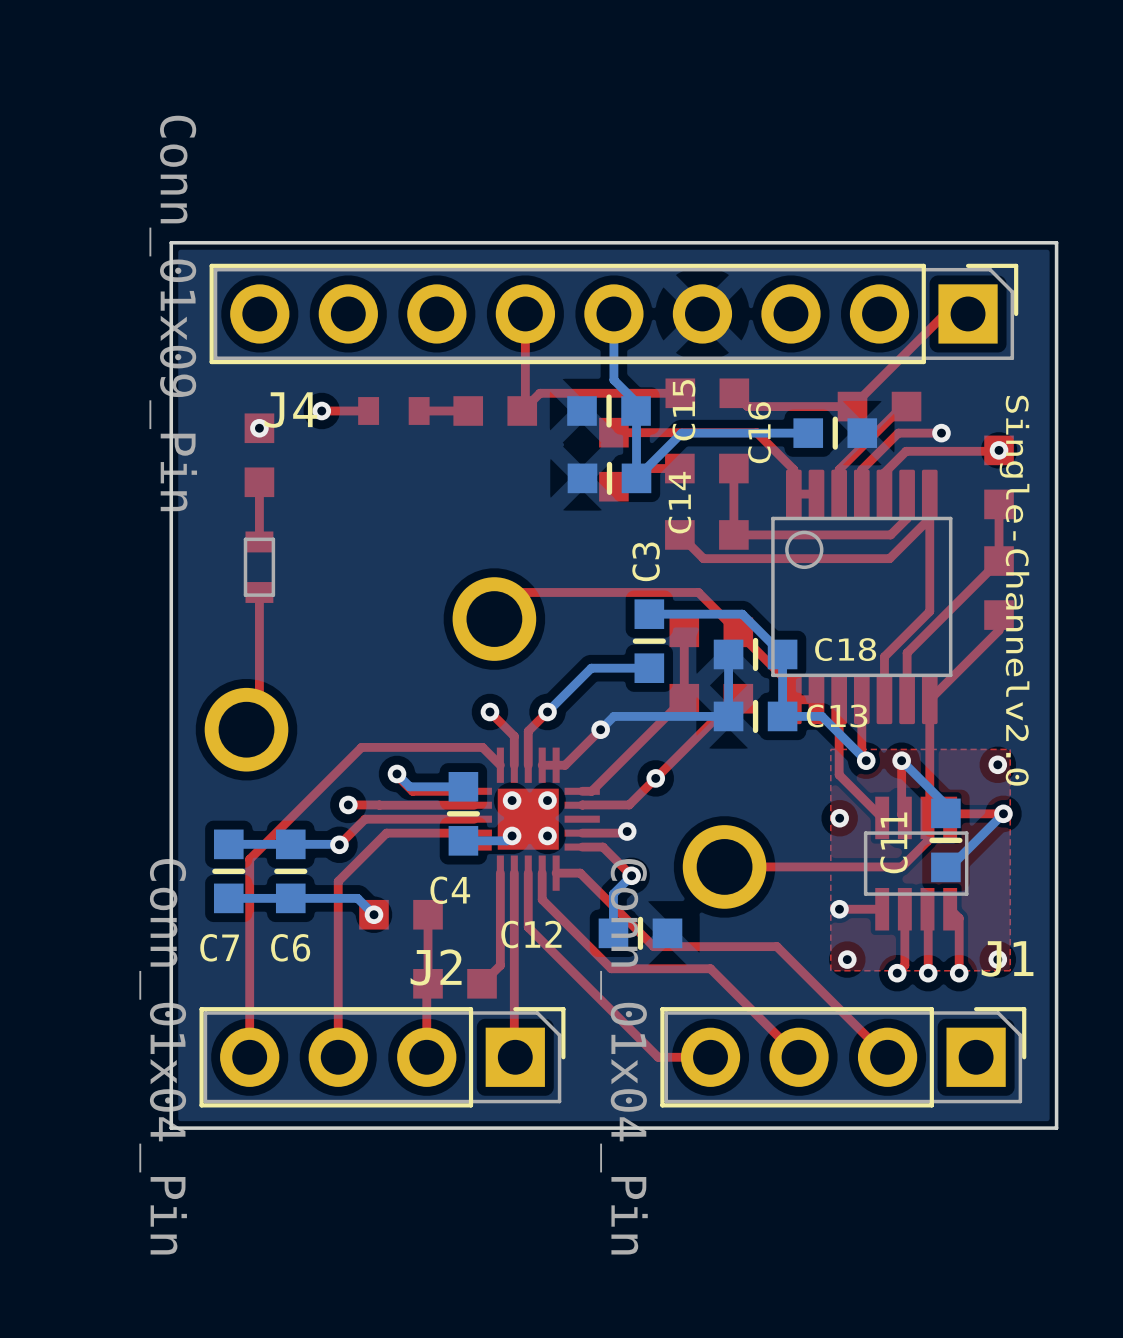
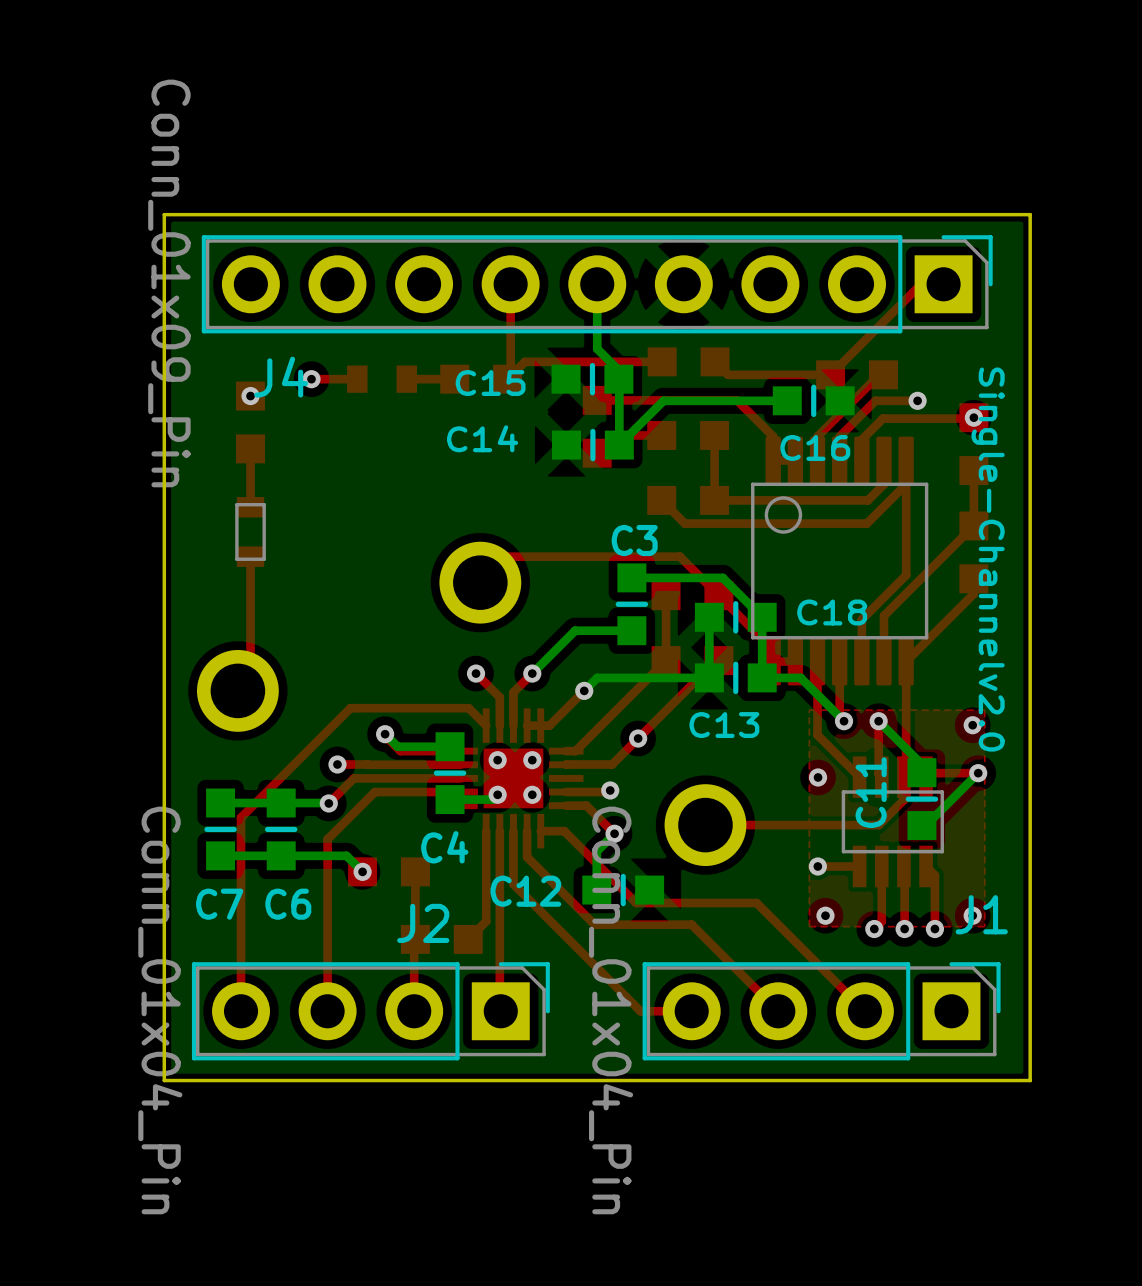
C15 name rotation: 0° (683, 410) -> 90° clockwise (490, 383)
C15 name position: C15 (683, 410) -> C15 (490, 383)
C16 name rotation: 0° (759, 432) -> 90° clockwise (815, 447)
C16 name position: C16 (759, 432) -> C16 (815, 447)
C14 name rotation: 0° (679, 502) -> 90° clockwise (482, 438)
C14 name position: C14 (679, 502) -> C14 (482, 438)
C3 name rotation: 0° (646, 561) -> 90° clockwise (634, 540)
C13 name position: C13 (837, 715) -> C13 (724, 725)

